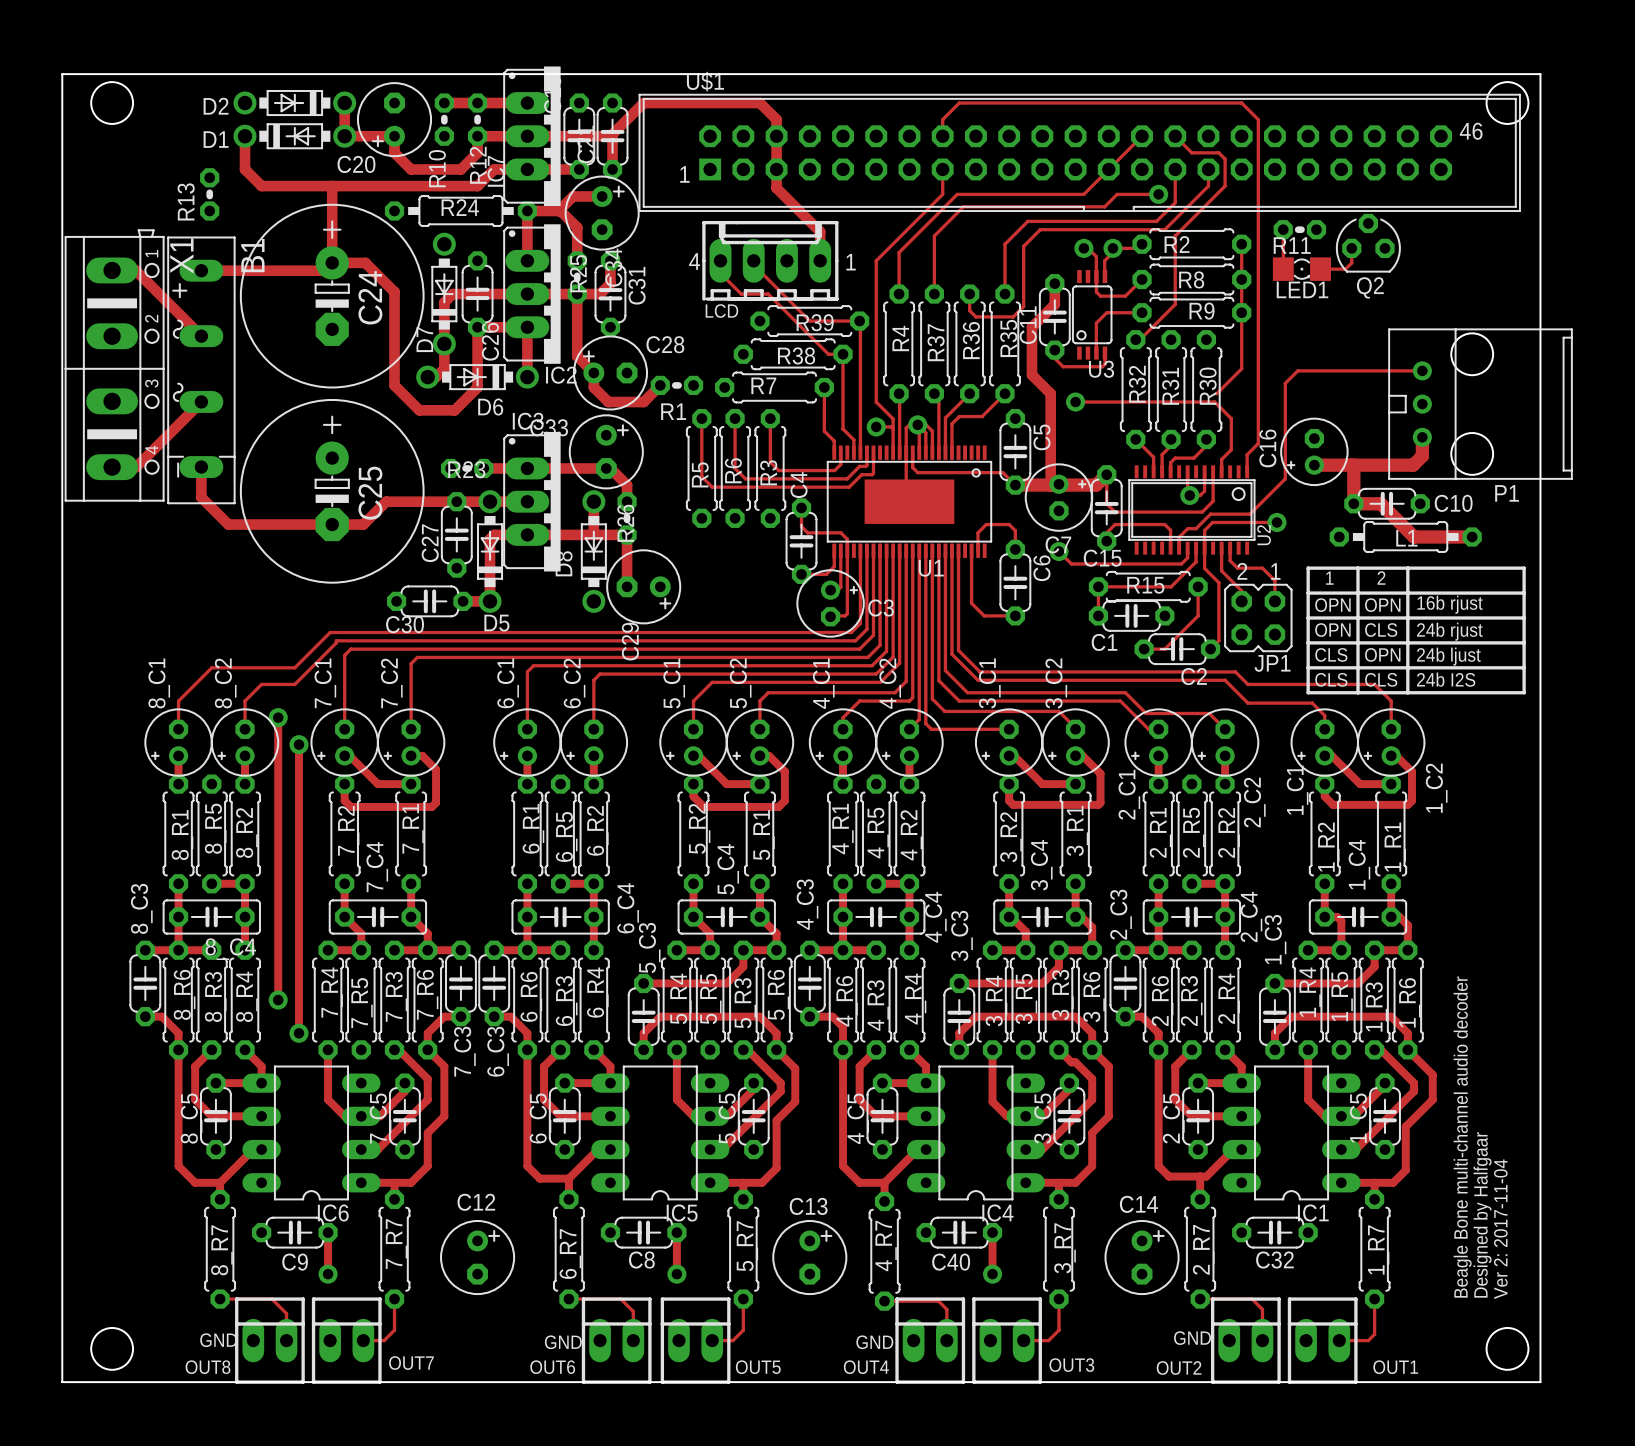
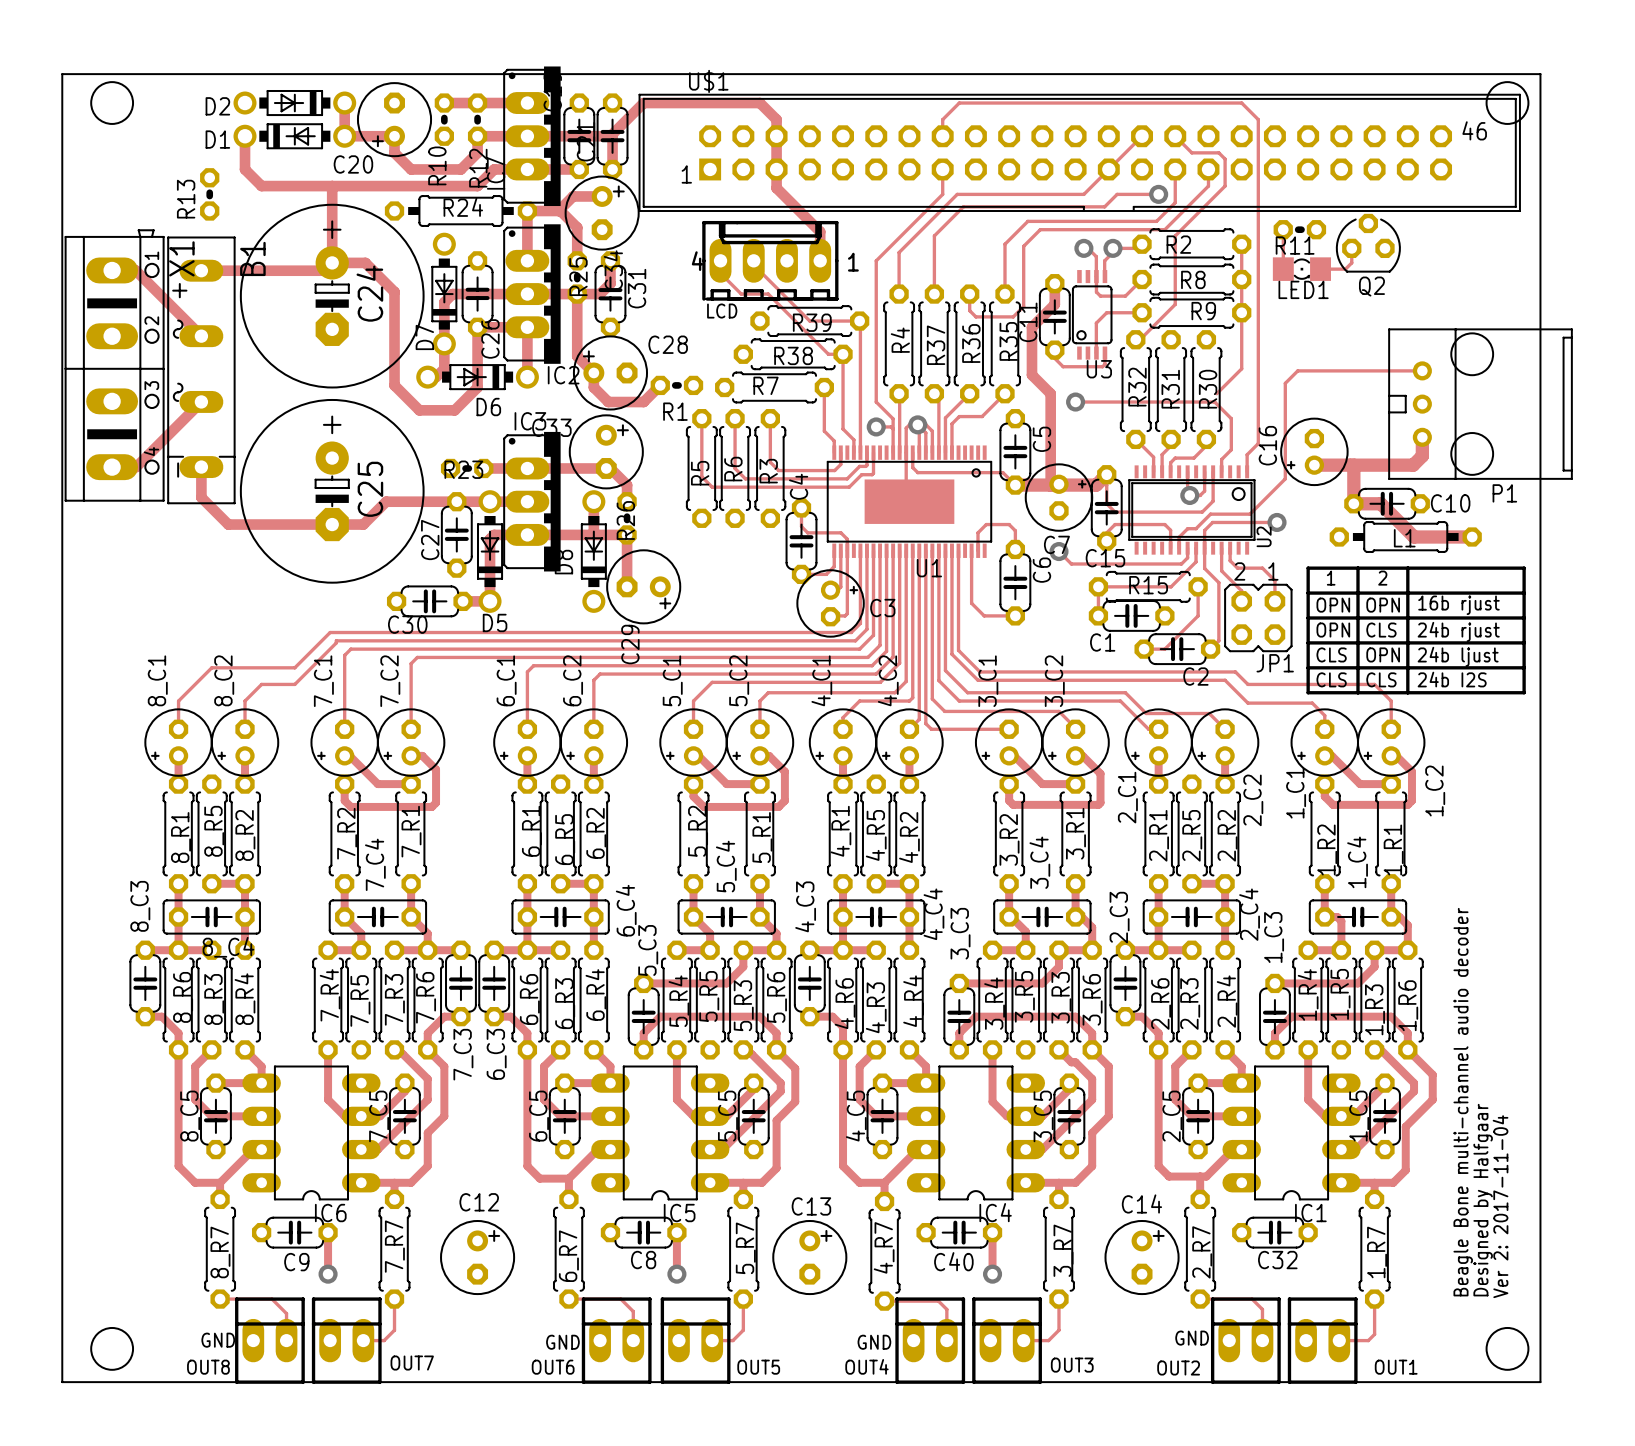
track: (278, 717) (278, 1000) -> none
via: (278, 717) -> none
track: (299, 744) (299, 1033) -> none
via: (299, 744) -> none
via: (278, 1000) -> none
via: (299, 1033) -> none

